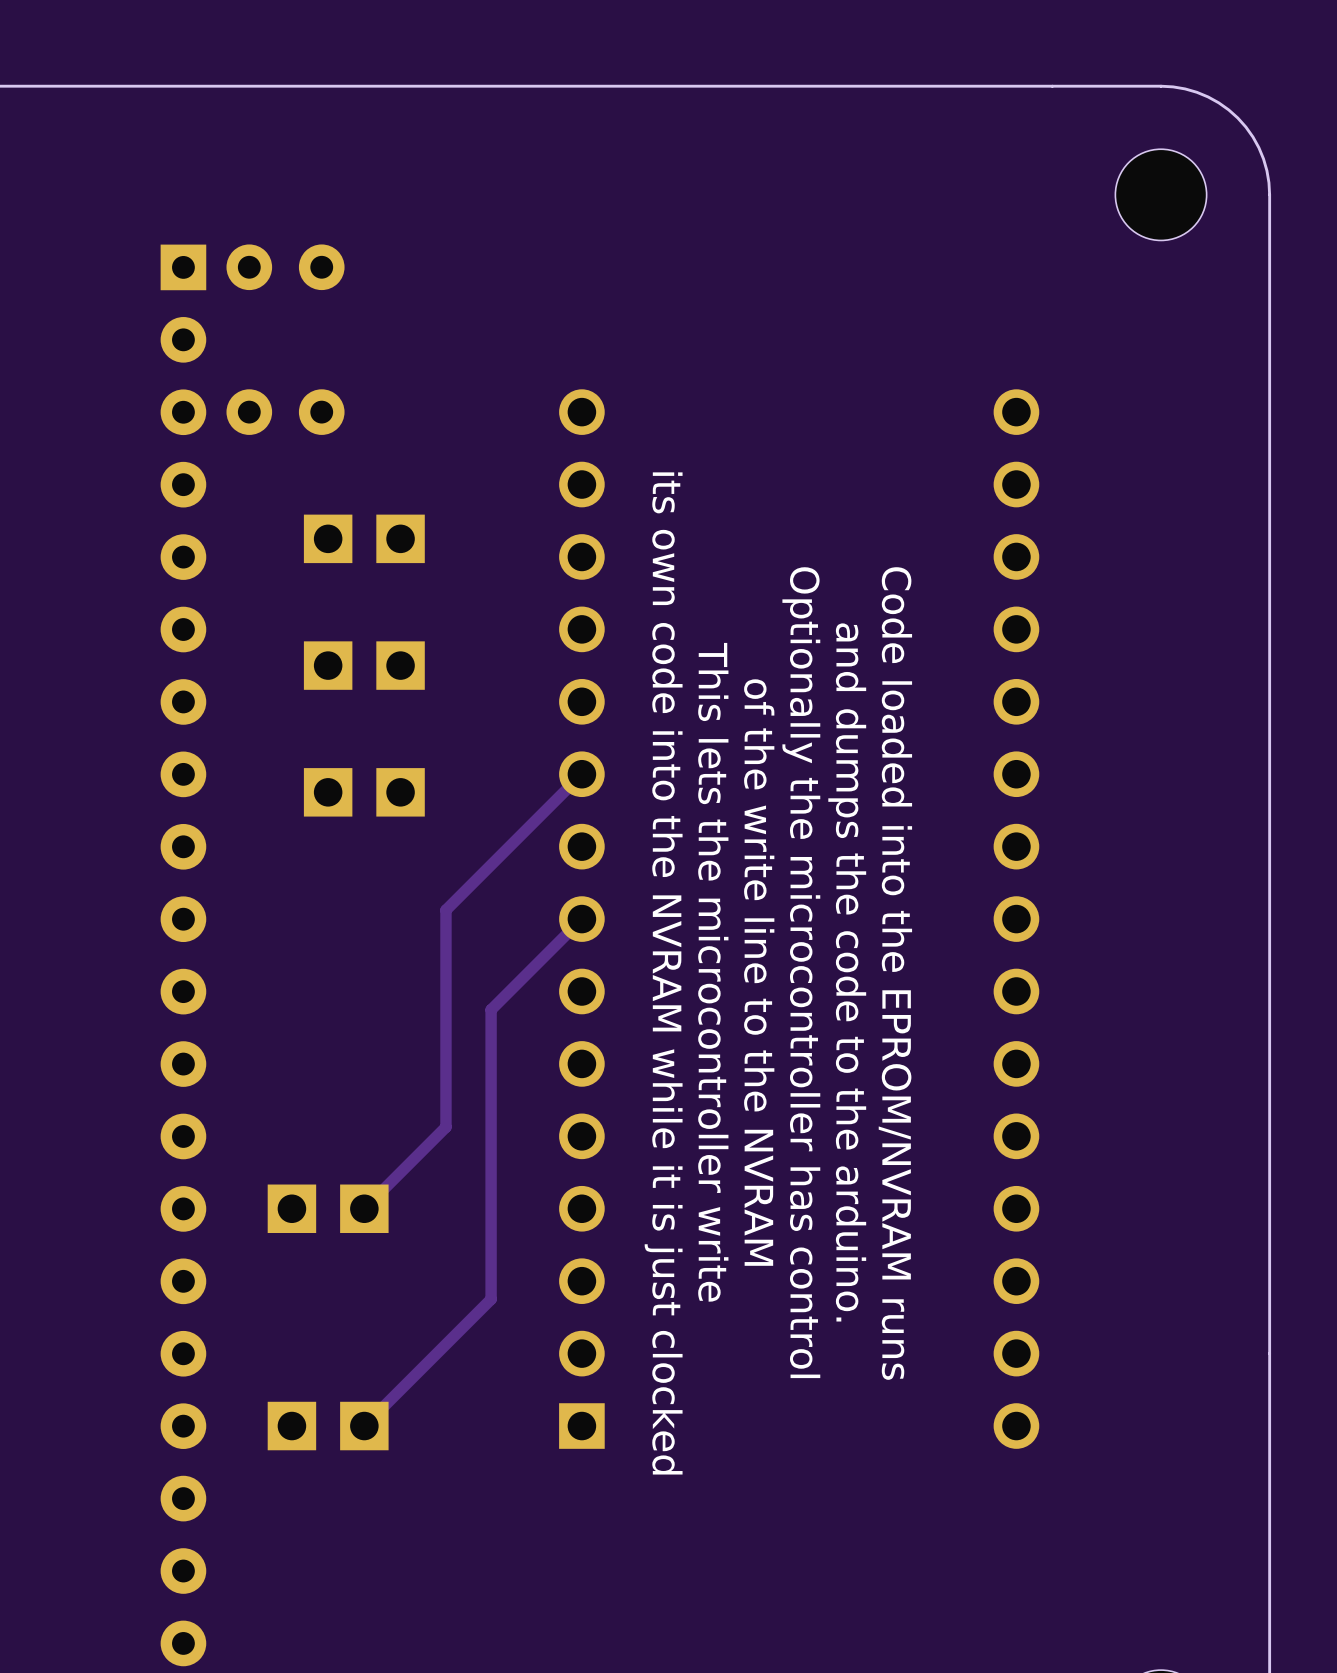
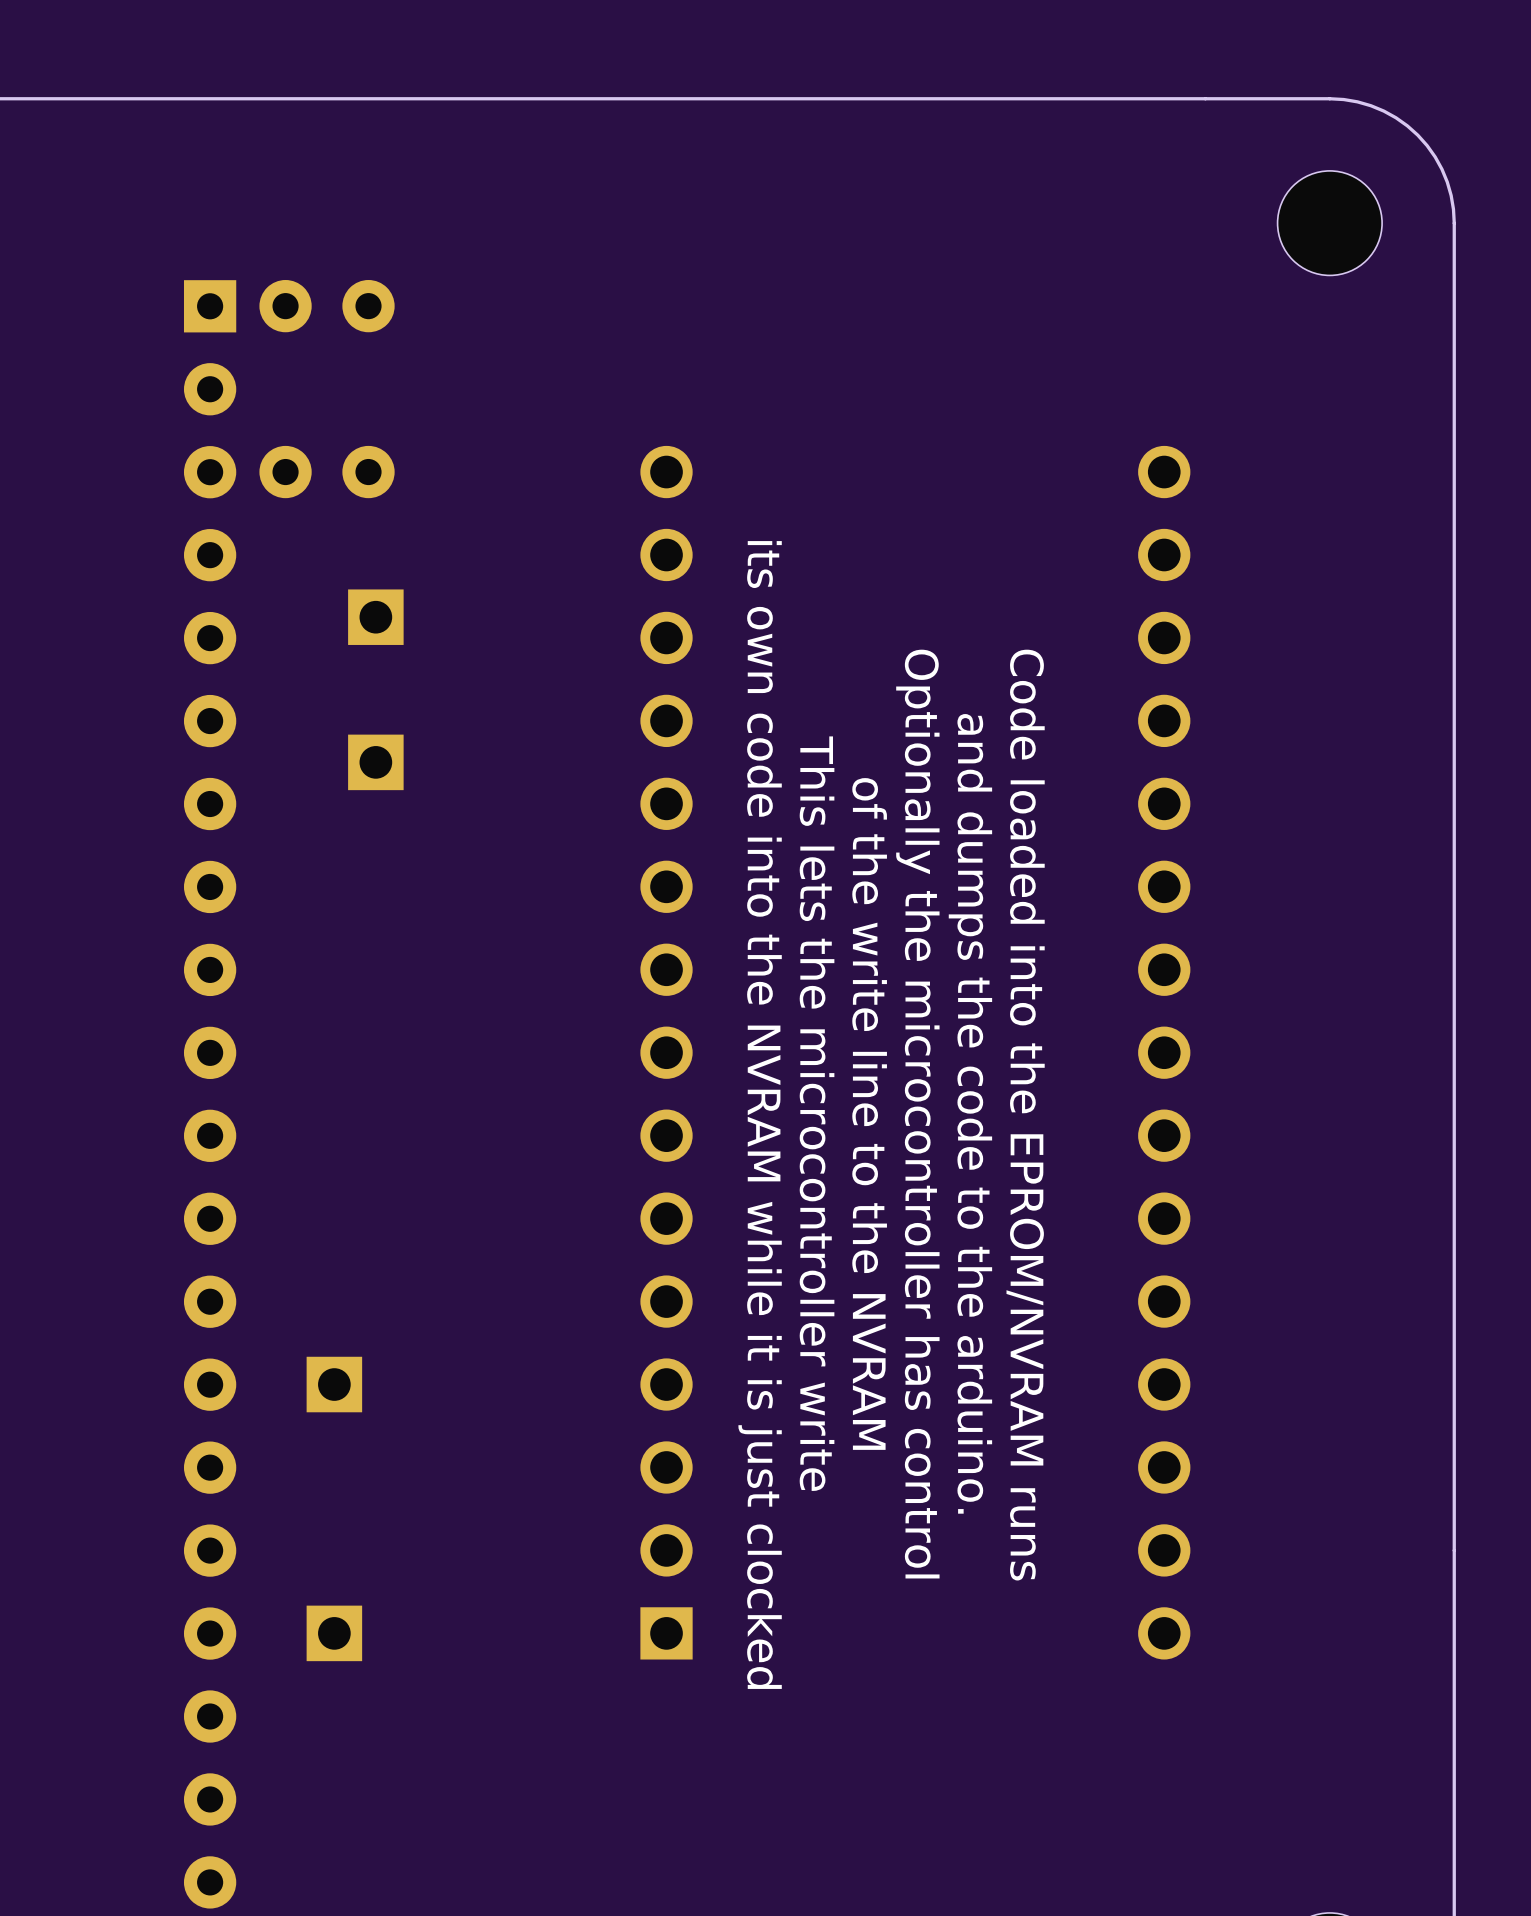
part: (400, 538) -> none
part: (400, 665) -> none
track: (581, 774) (445, 910) (445, 1127) (364, 1208) -> none
part: (328, 792) -> none
part: (400, 792) -> none
track: (581, 919) (491, 1009) (491, 1299) (364, 1426) -> none
part: (364, 1208) -> none
part: (364, 1426) -> none

